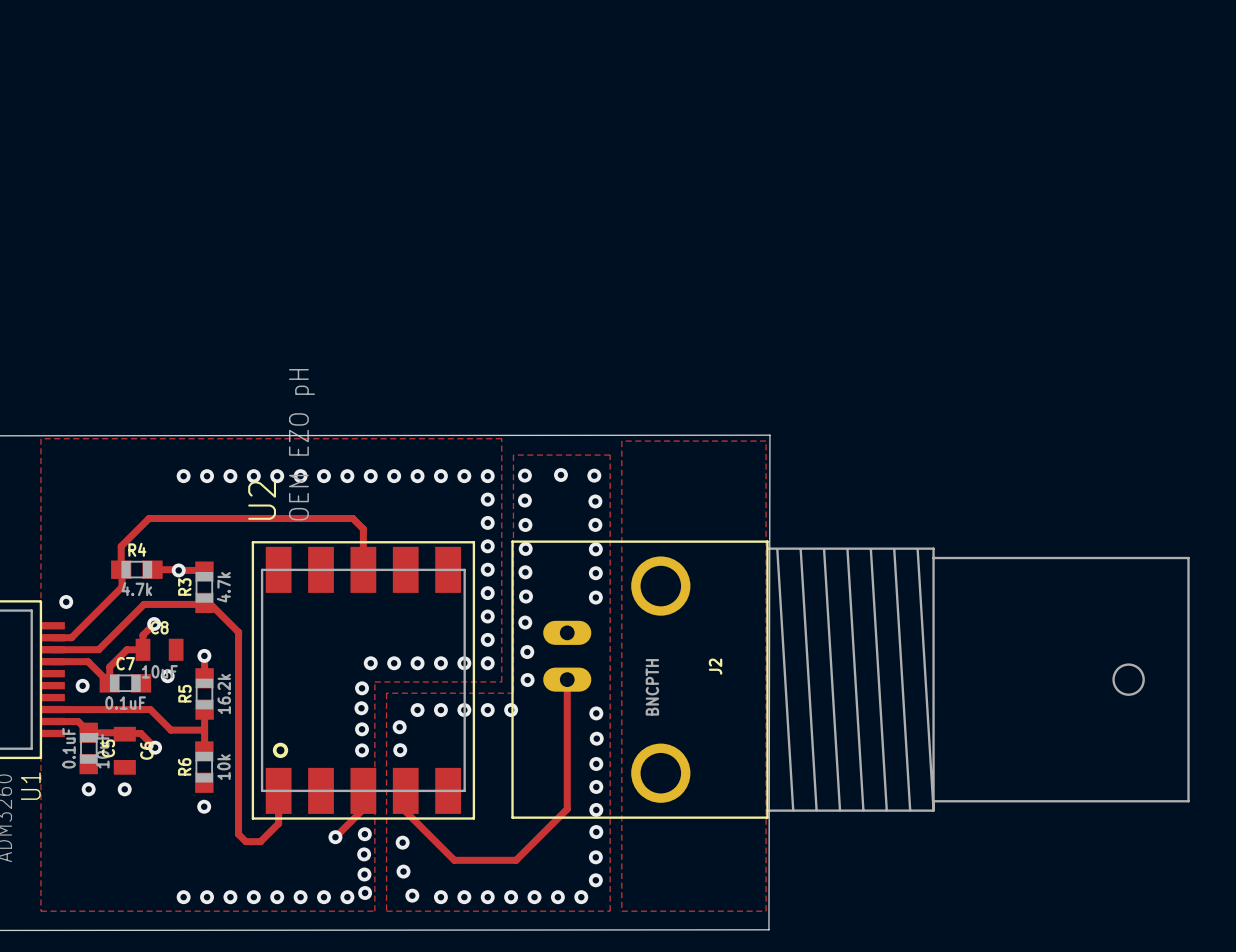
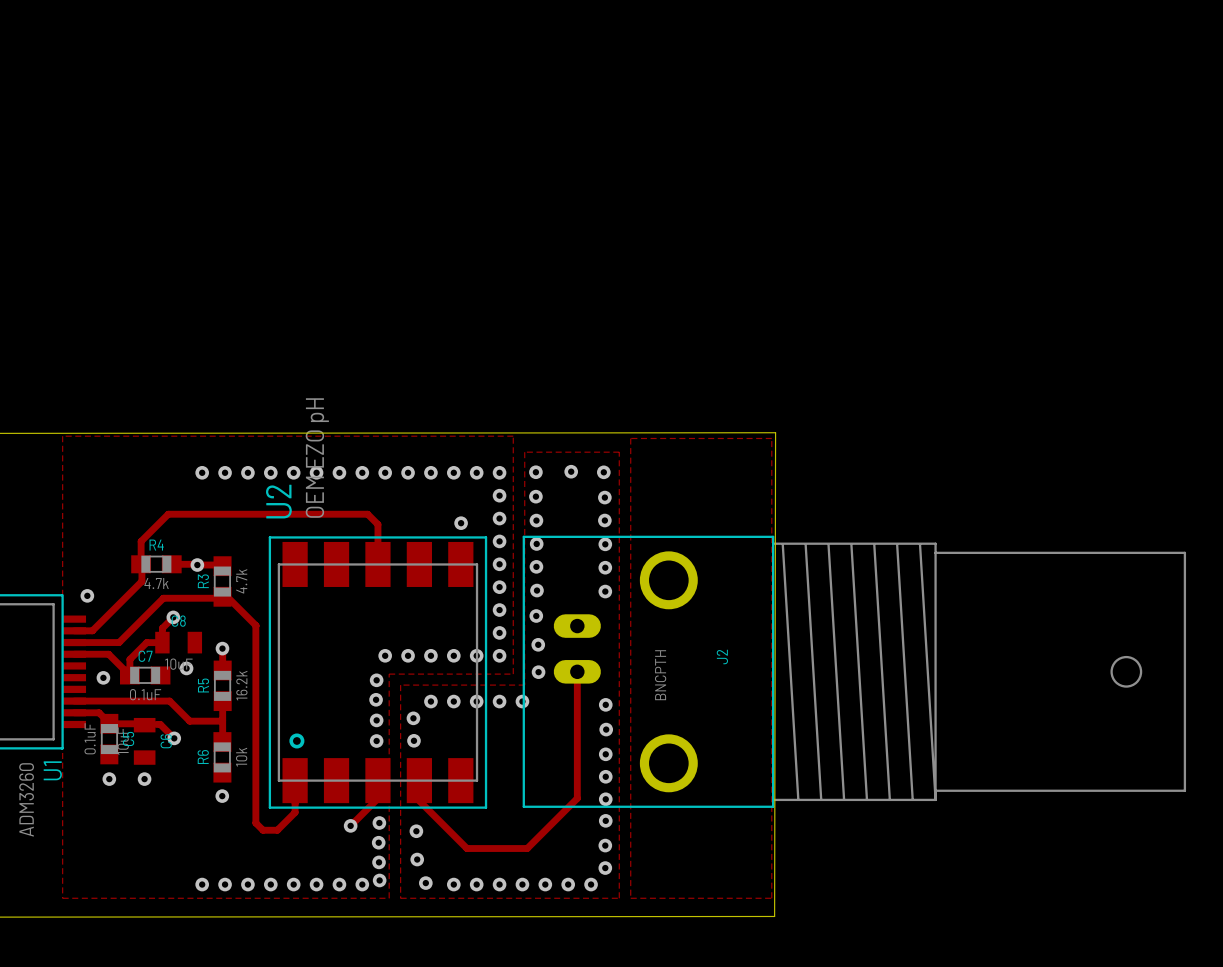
via: none -> (461, 523)

